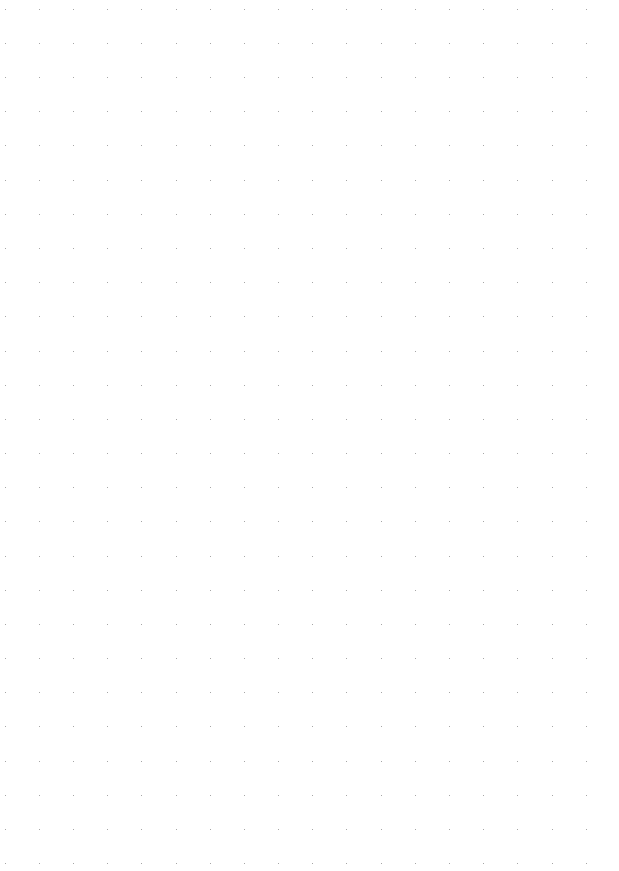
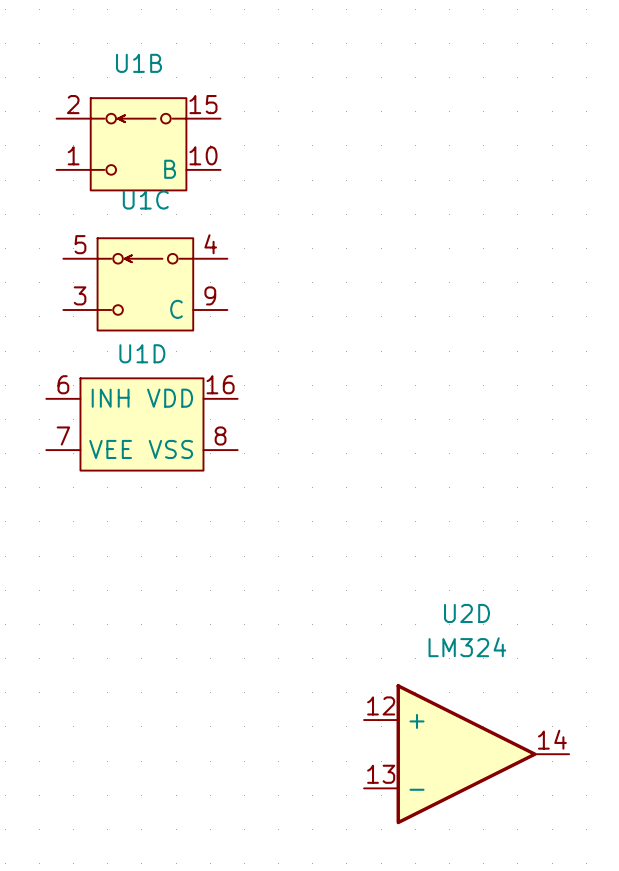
U1B: none -> (138, 144)
U1C: none -> (145, 284)
U1D: none -> (141, 424)
U2D: none -> LM324 (466, 754)

